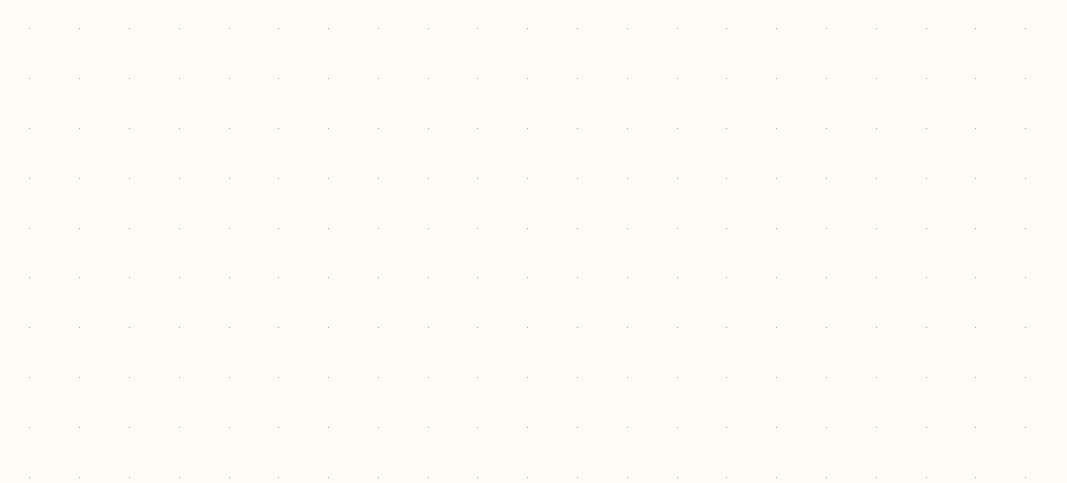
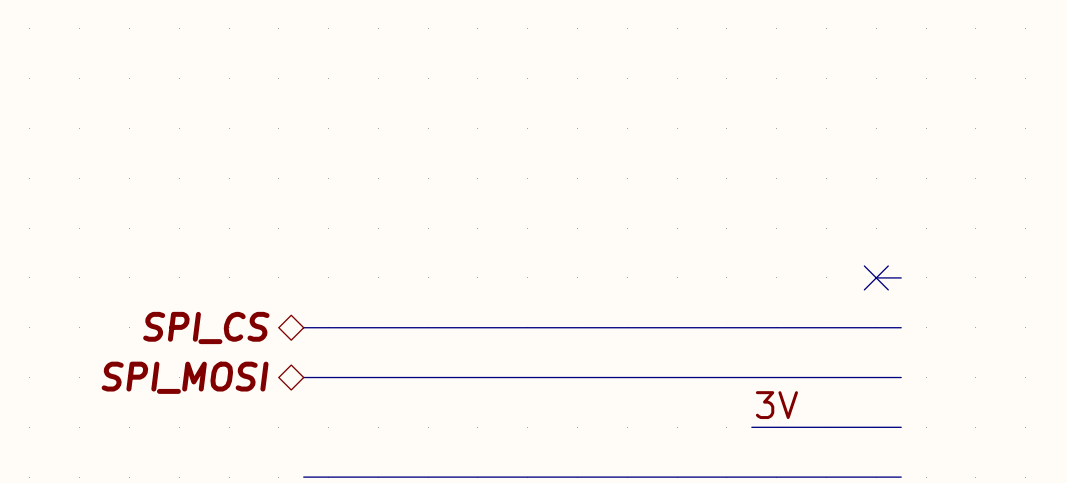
wire: none -> (876, 277) (901, 277)
no-connect mark: none -> (876, 277)
hierarchical label: none -> SPI_CS (206, 327)
wire: none -> (303, 327) (901, 327)
hierarchical label: none -> SPI_MOSI (185, 377)
wire: none -> (303, 377) (901, 377)
label: none -> 3V (776, 405)
wire: none -> (751, 427) (901, 427)
wire: none -> (303, 477) (901, 477)

